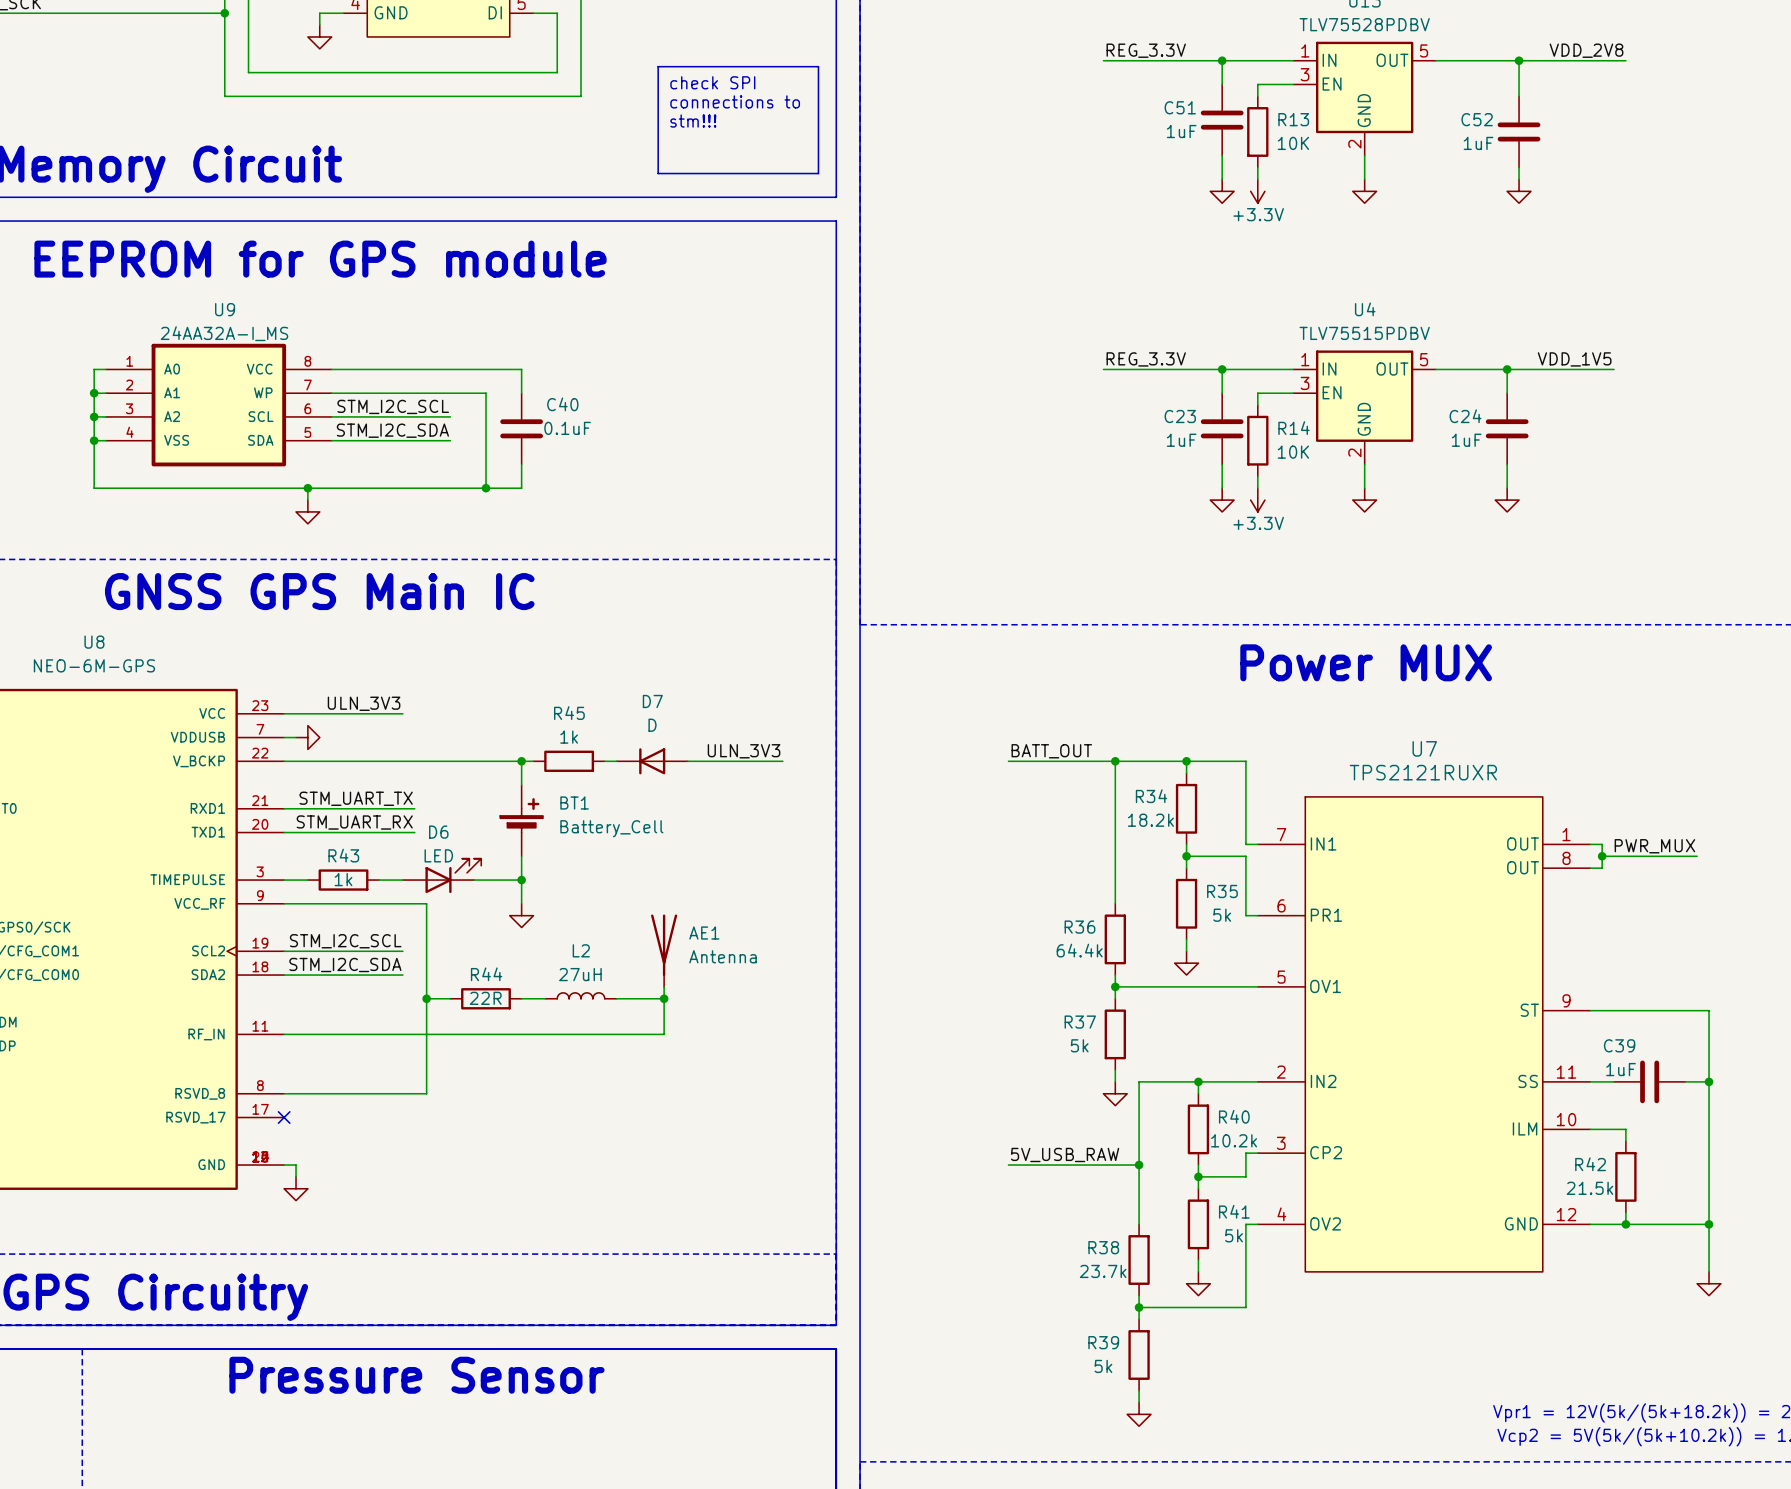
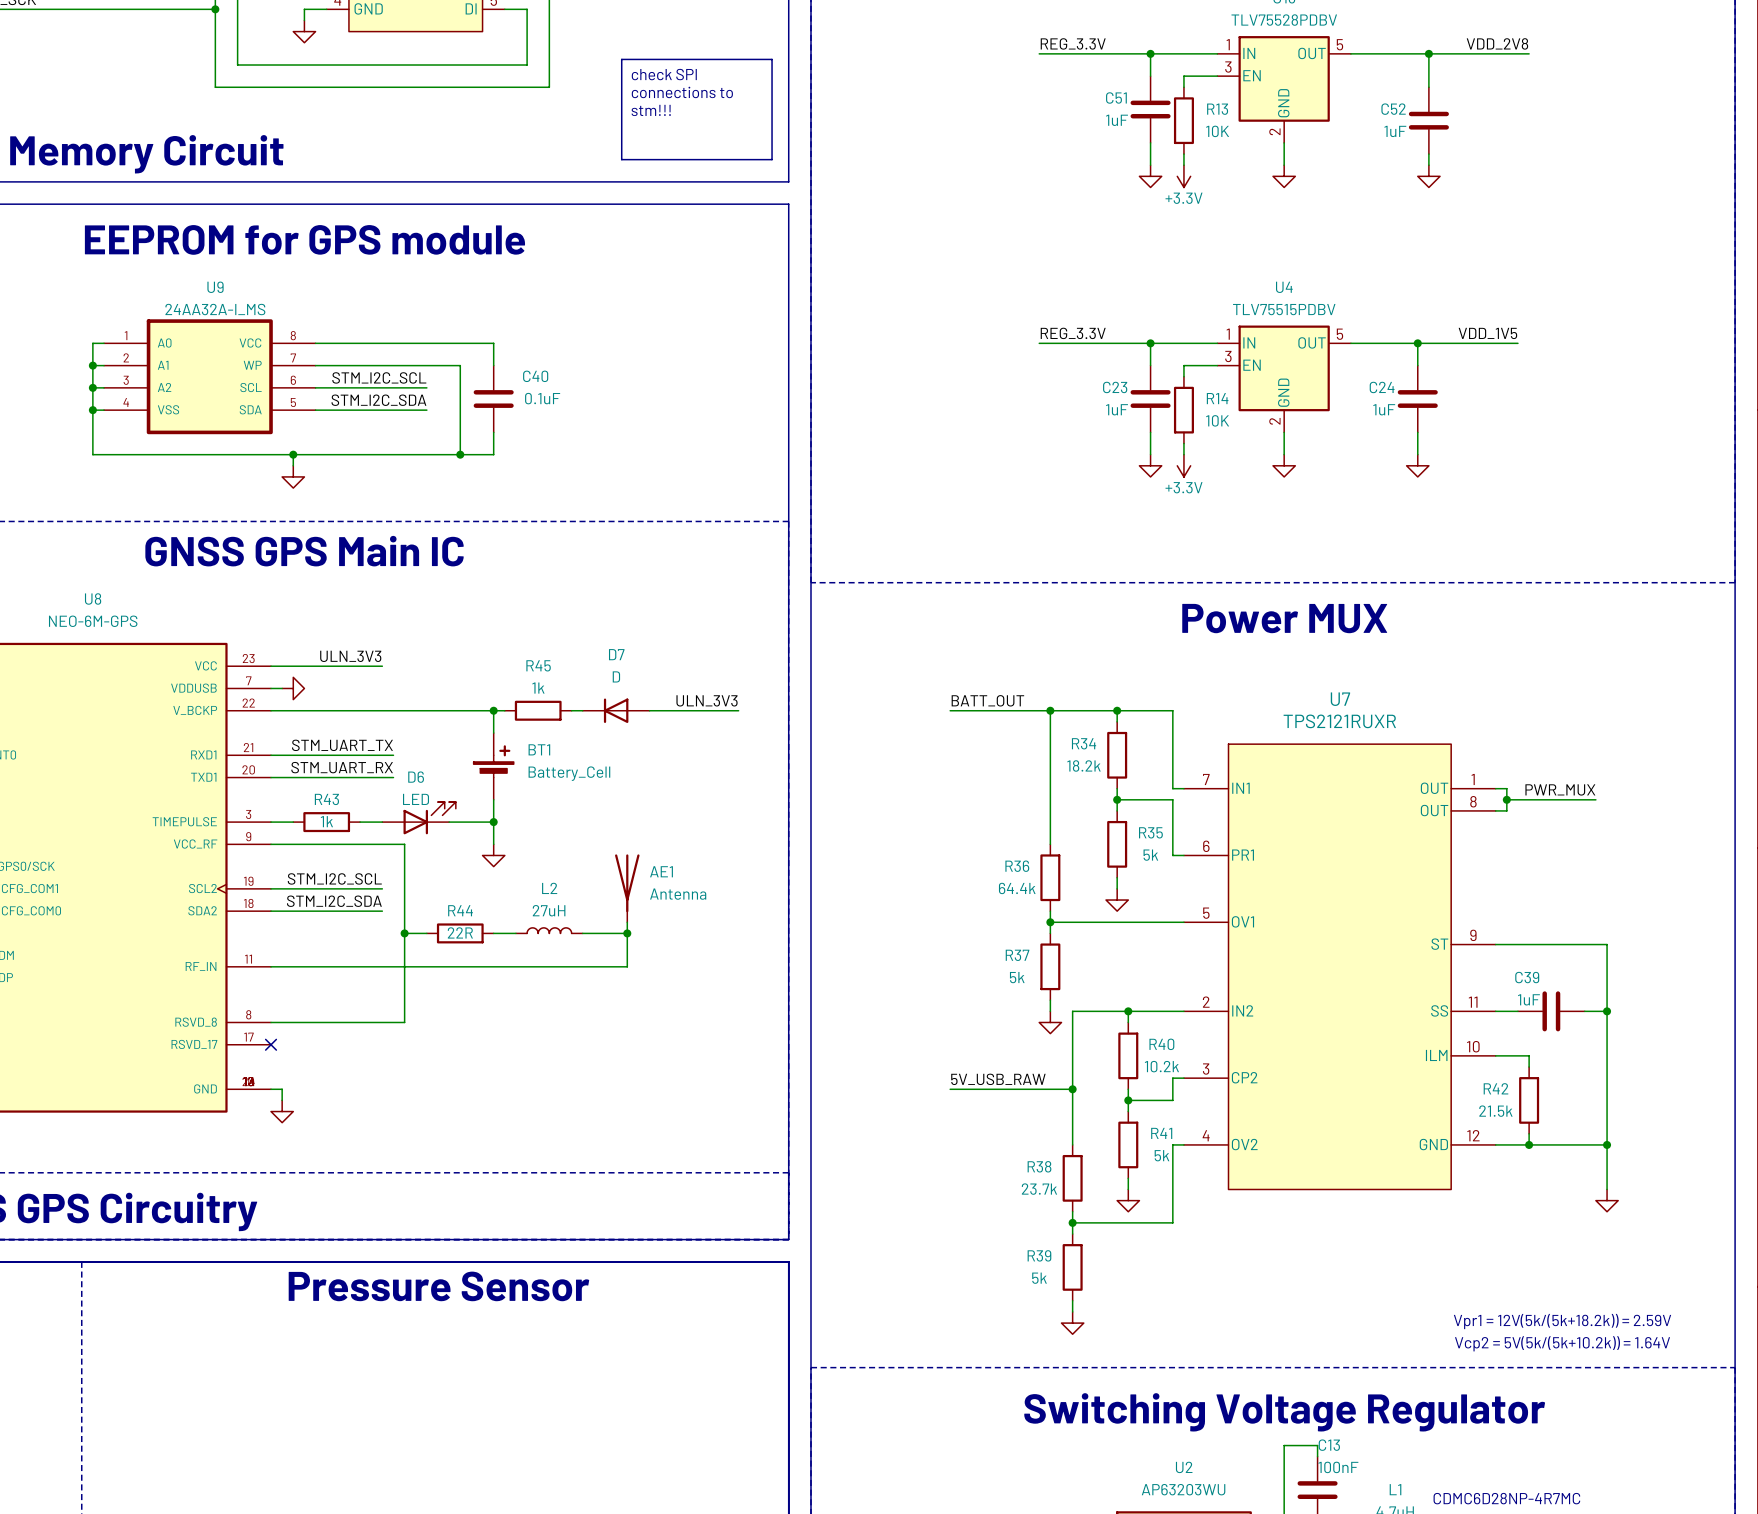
text position: Pressure Sensor (416, 1375) -> Pressure Sensor (438, 1286)

